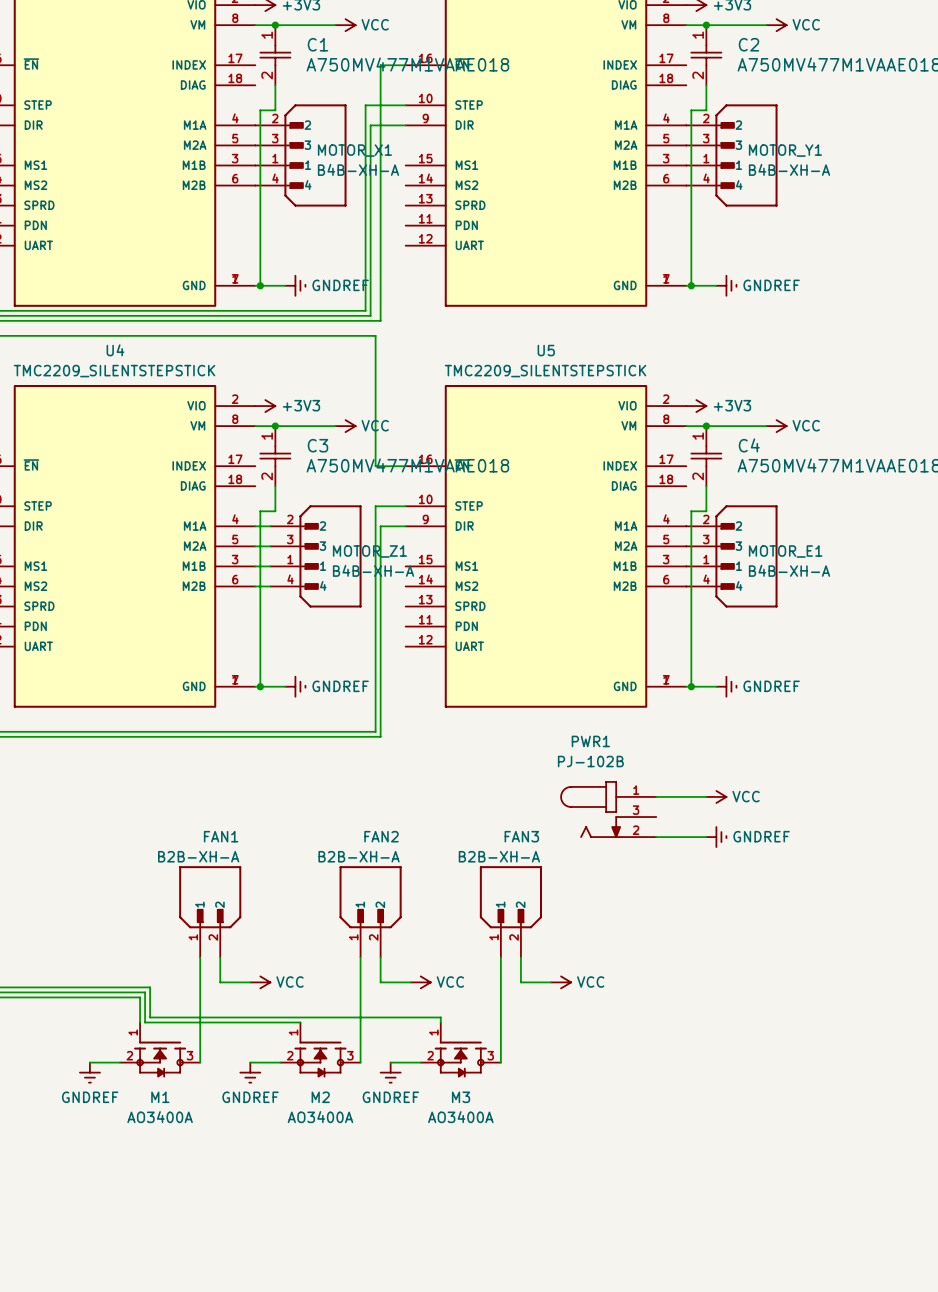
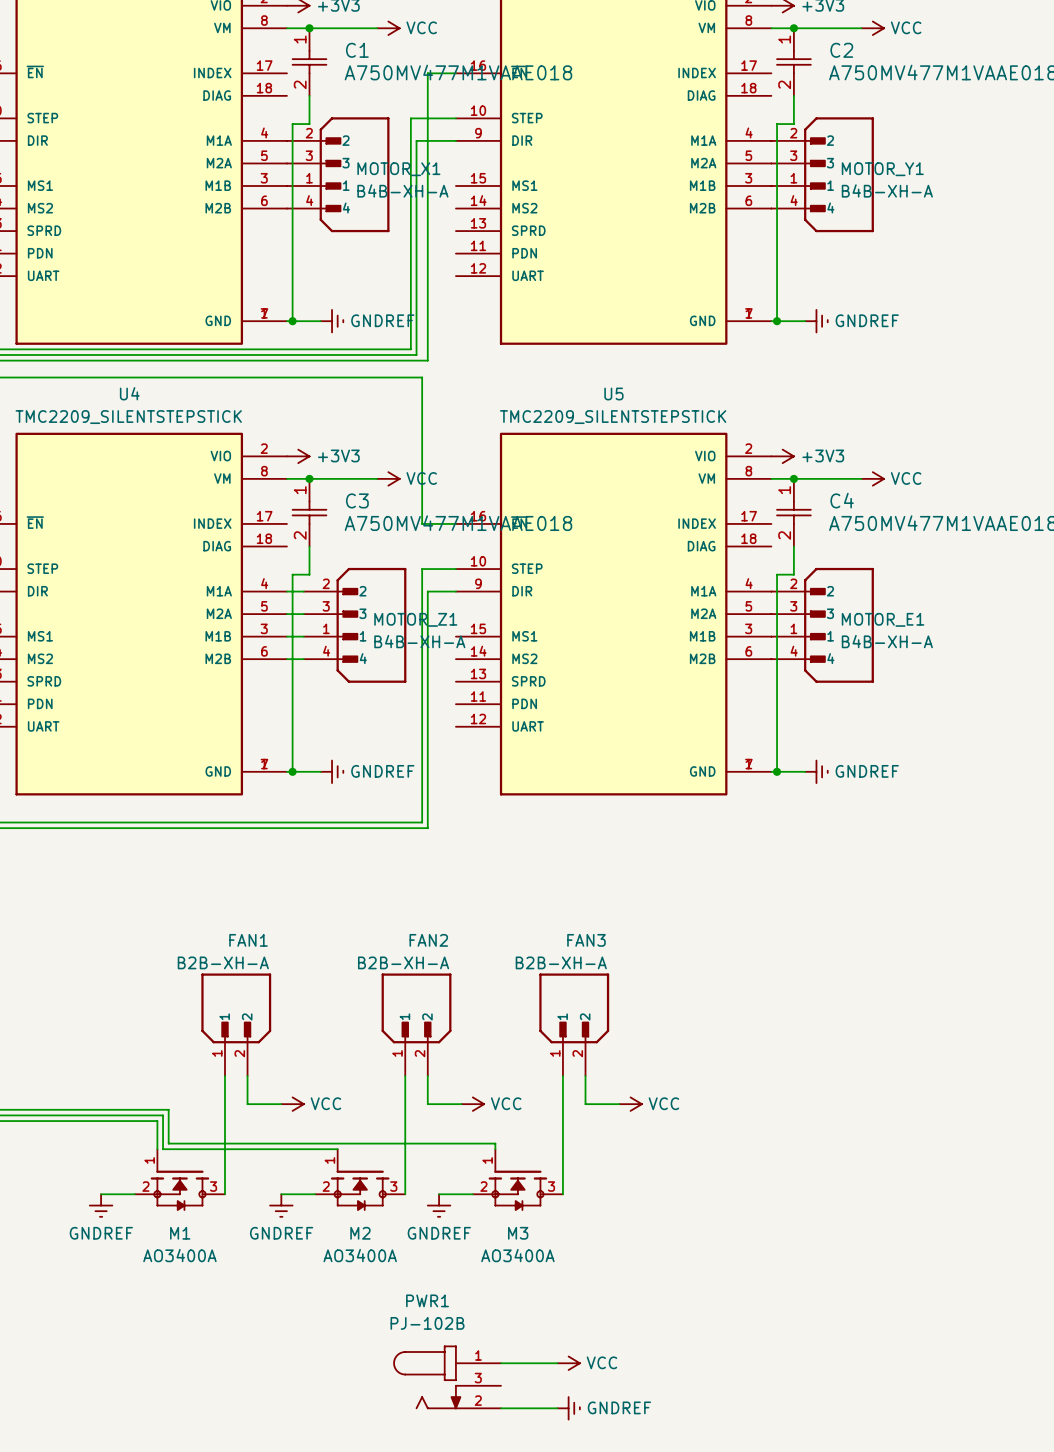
wire: (656, 796) (706, 796) -> none
power symbol: VCC (716, 796) -> none
PWR1 position: (608, 809) -> (447, 1377)
wire: (656, 837) (706, 837) -> none
power symbol: GNDREF (716, 837) -> none
wire: none -> (501, 1363) (557, 1363)
power symbol: none -> VCC (568, 1363)
wire: none -> (501, 1408) (557, 1408)
power symbol: none -> GNDREF (568, 1408)

